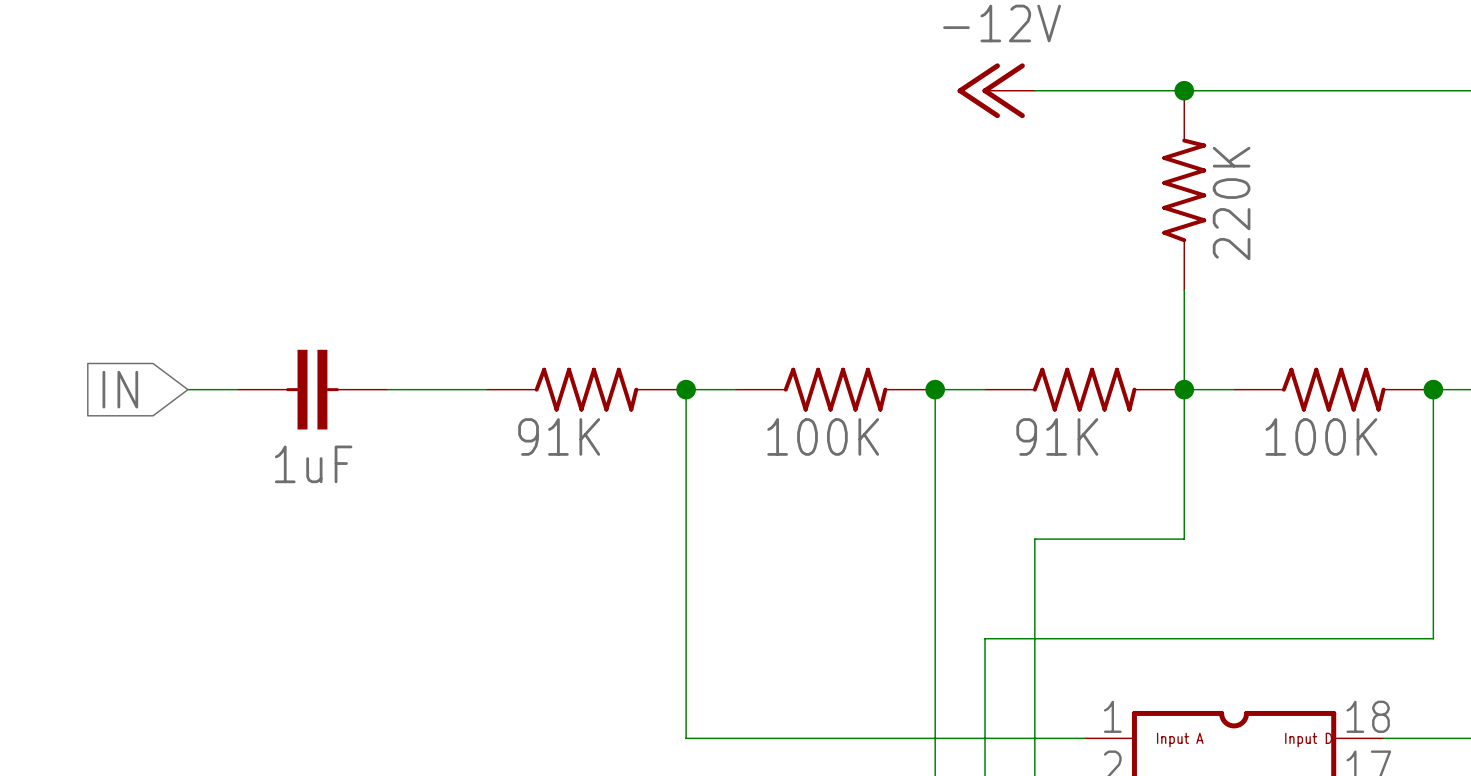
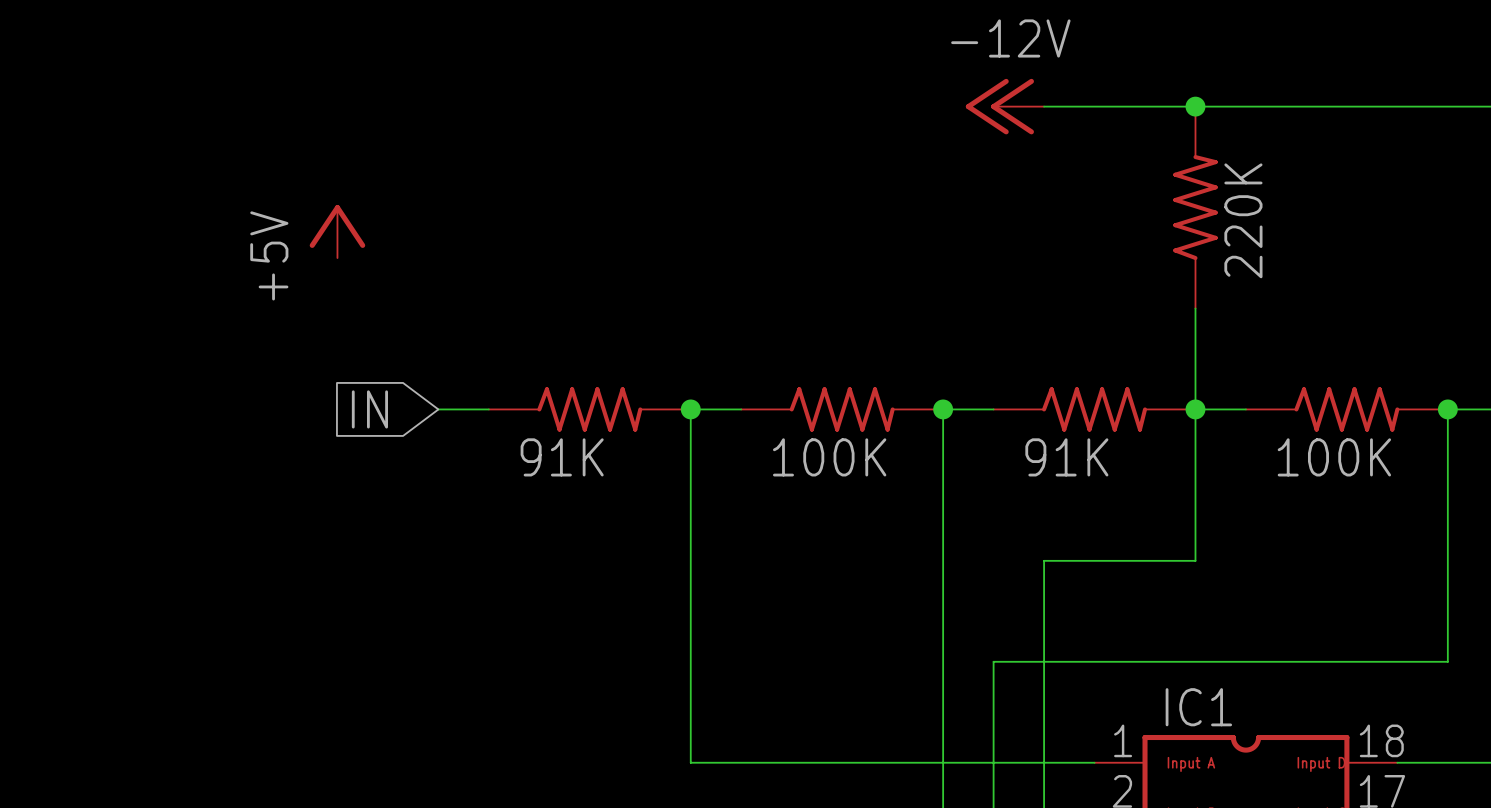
power symbol: none -> +5V (337, 231)
global label position: IN (120, 389) -> IN (369, 409)
wire: (187, 389) (237, 389) -> none
part: 1uF (312, 389) -> none
wire: (387, 389) (437, 389) -> none
IC1 name: none -> IC1 (1198, 707)

